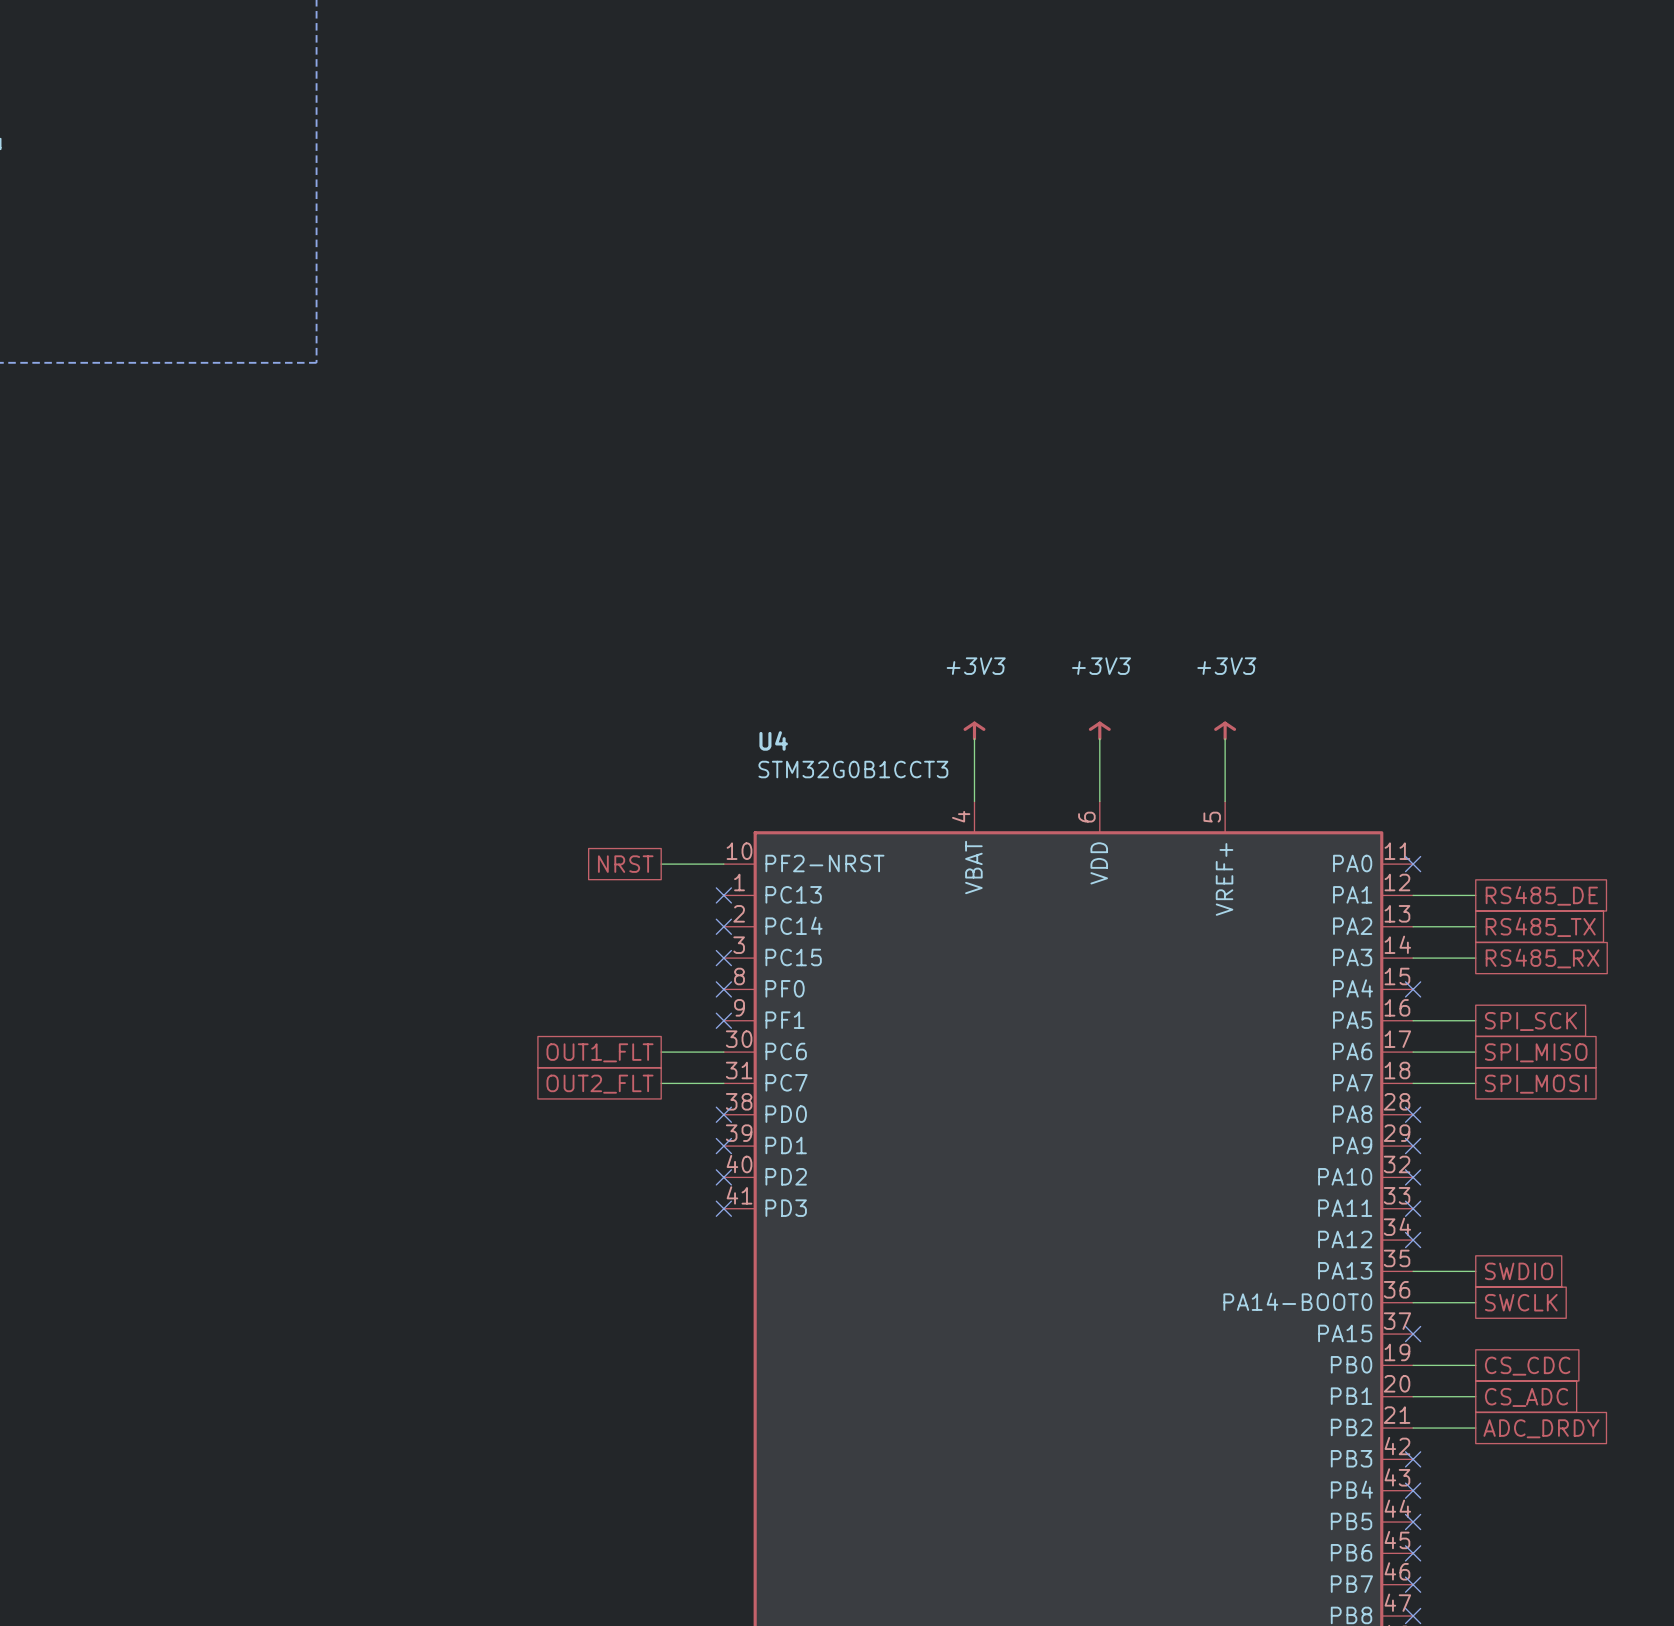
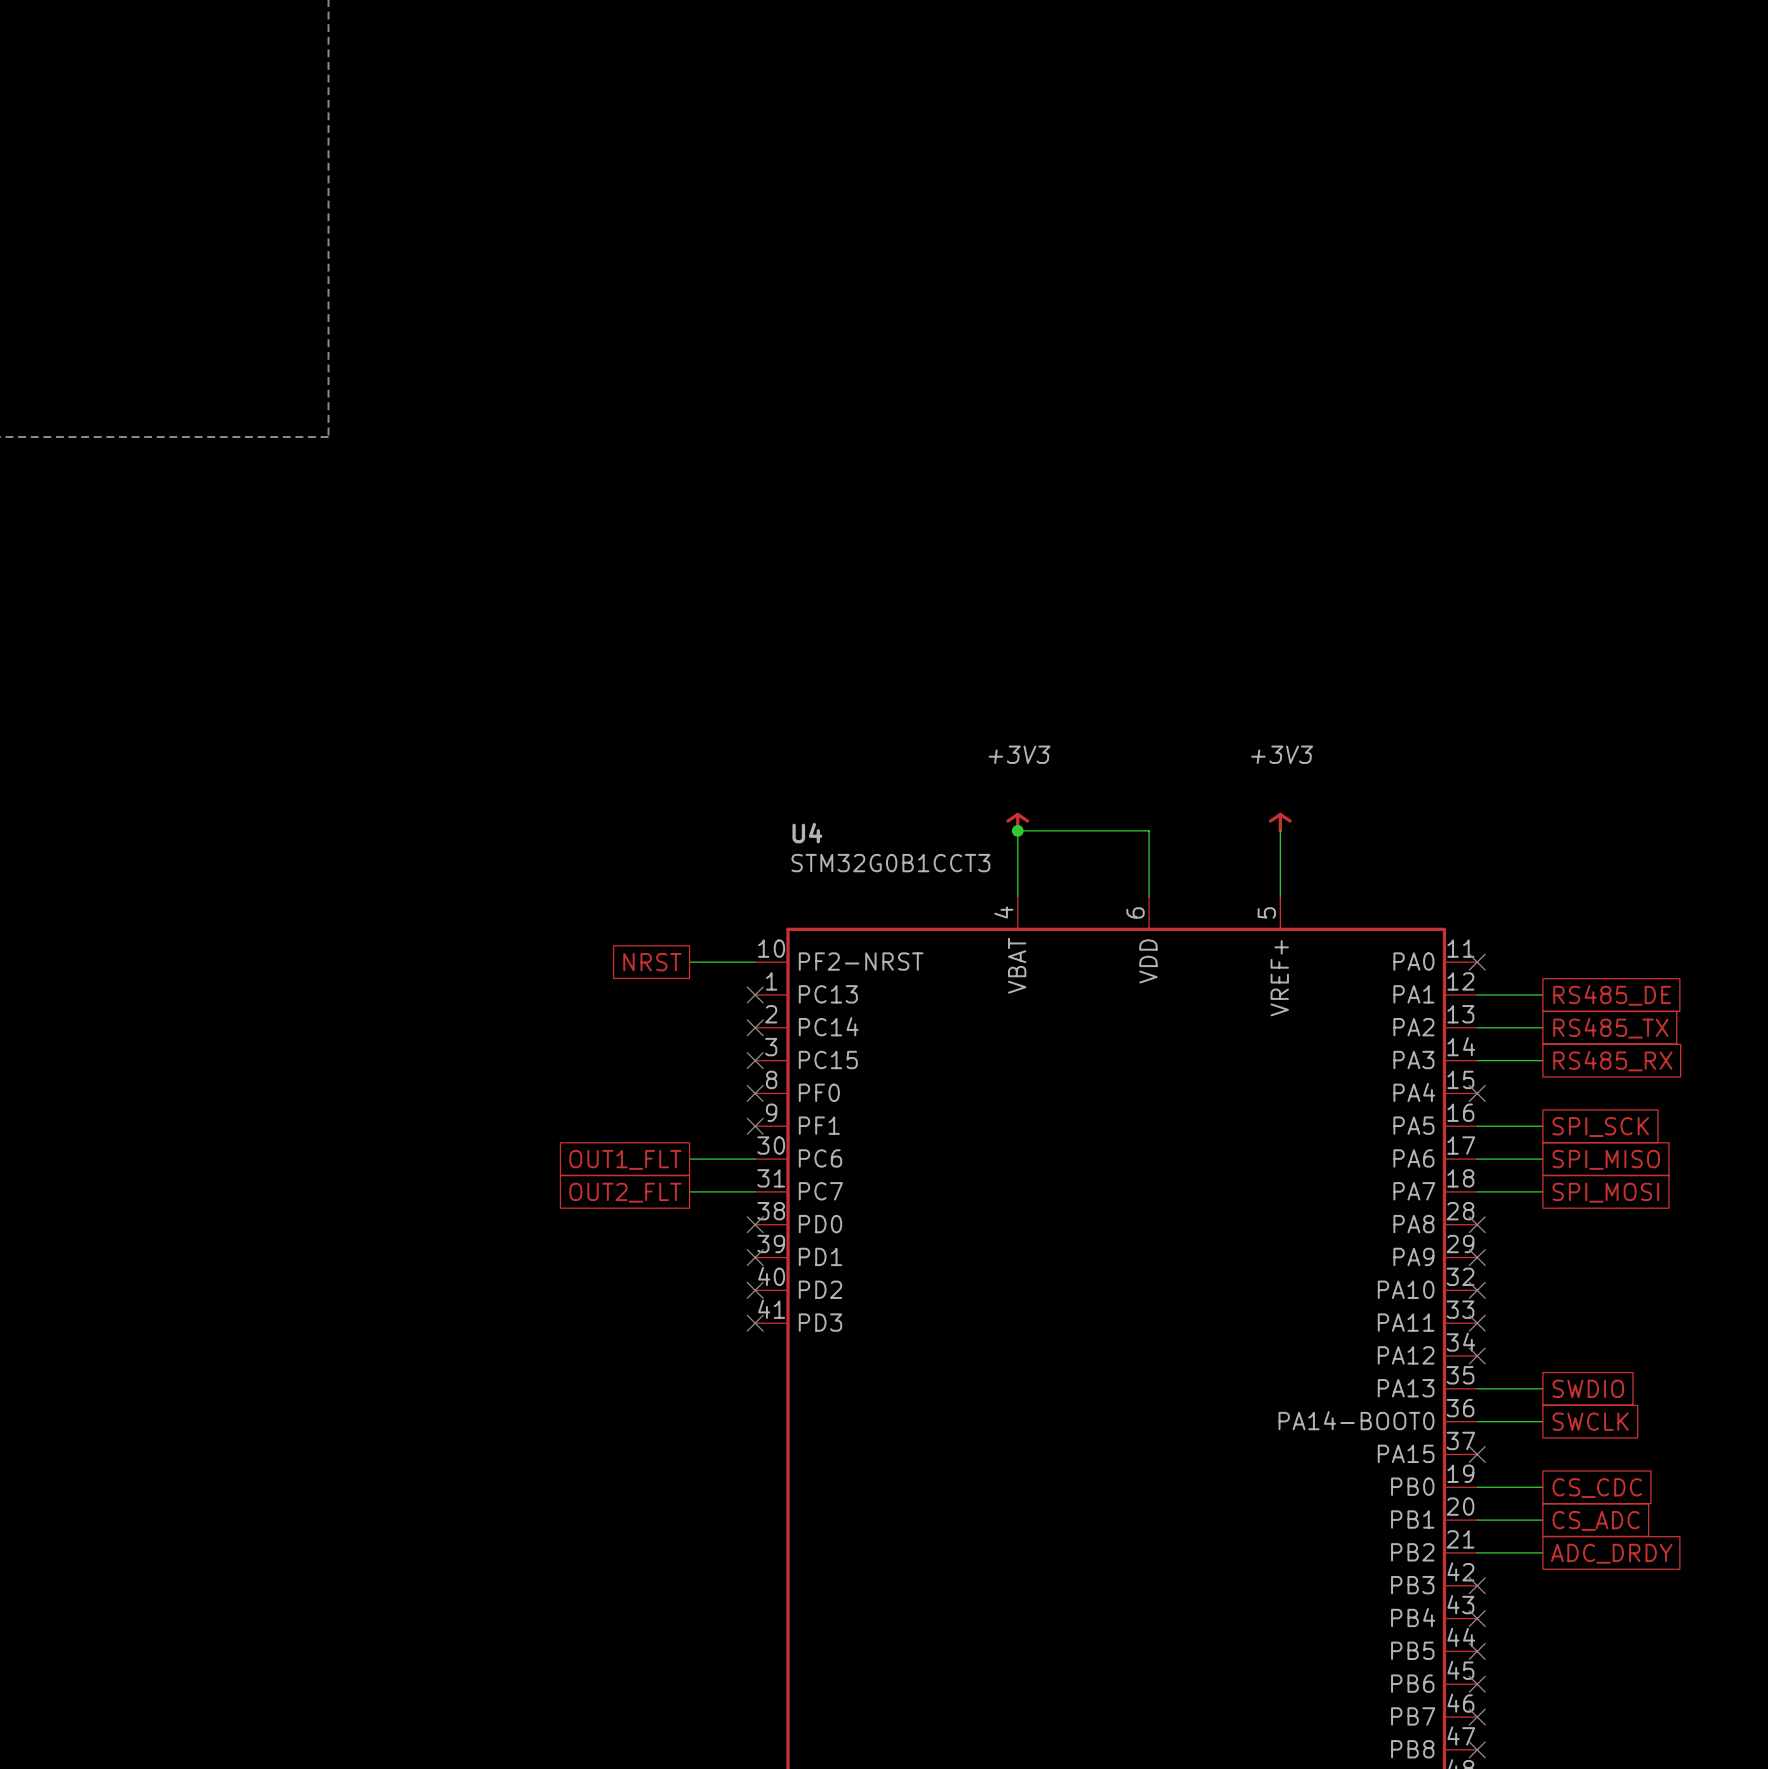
power symbol: +3V3 (1099, 730) -> none
wire: none -> (1017, 830) (1149, 830)
junction: none -> (1017, 830)

